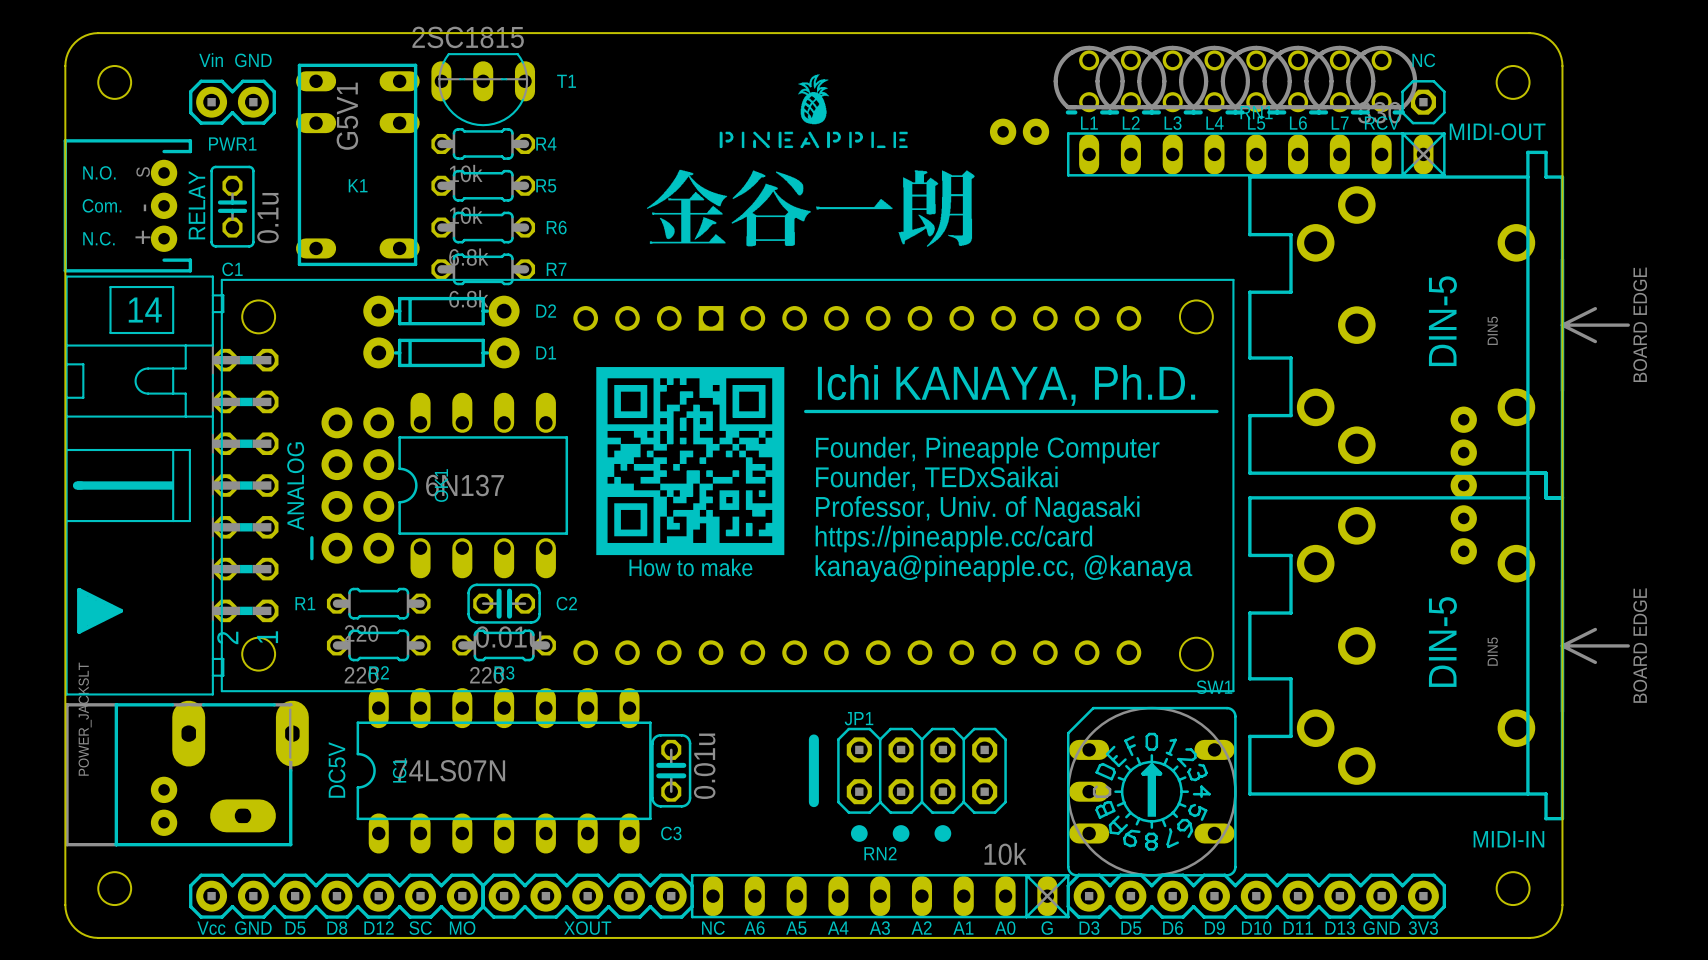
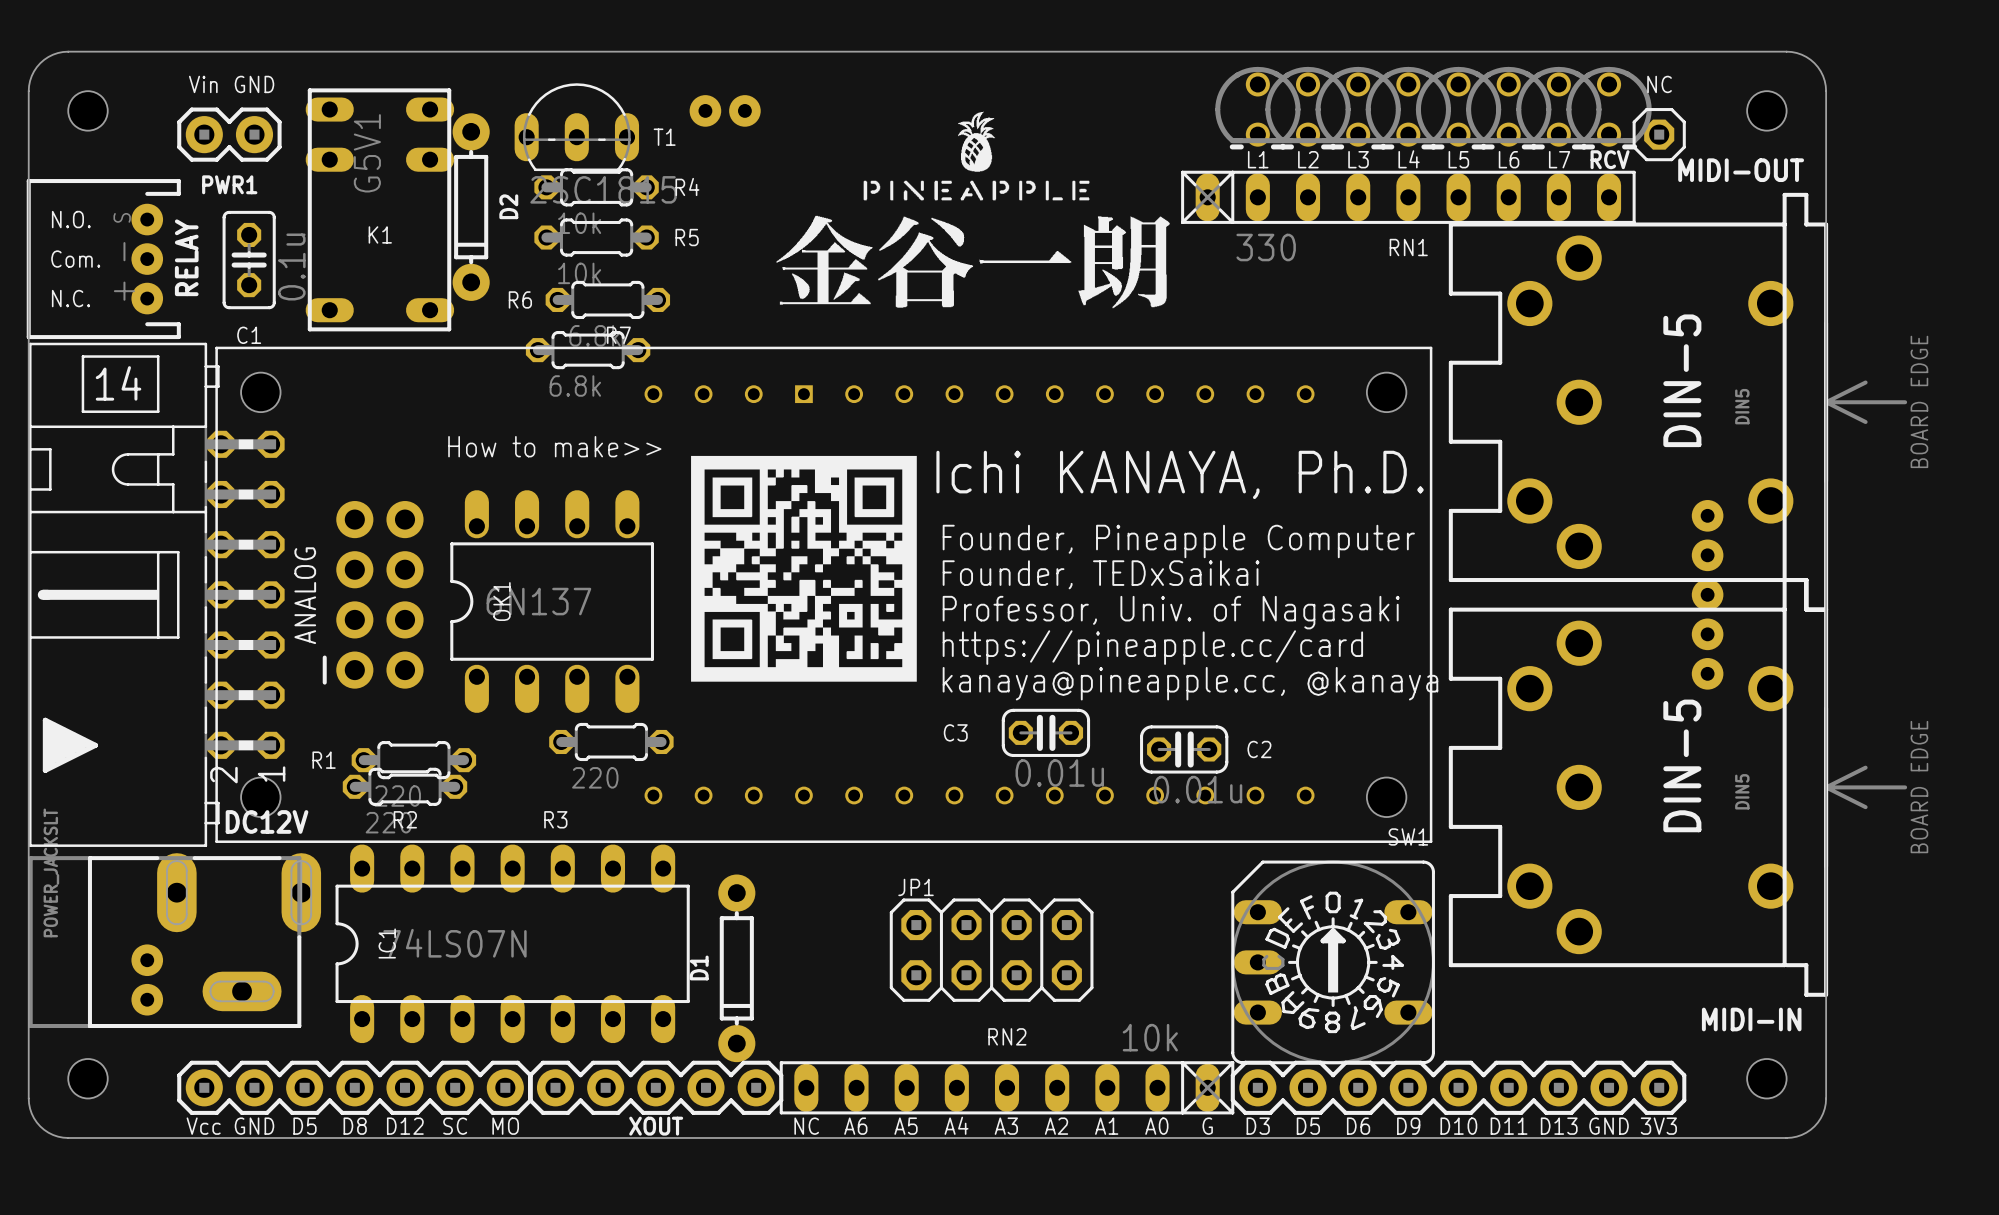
T1 rotation: 0° (483, 89) -> 180° (576, 127)
drawing position: (813, 111) -> (976, 155)
part position: (1019, 131) -> (725, 110)
R4 position: (483, 143) -> (596, 187)
R4 name position: R4 (546, 143) -> R4 (687, 186)
RN1 rotation: 0° (1256, 154) -> 180° (1408, 197)
R5 position: (483, 185) -> (596, 237)
R5 name position: R5 (546, 185) -> R5 (687, 237)
C1 position: (232, 206) -> (249, 260)
drawing position: (810, 208) -> (973, 262)
R6 position: (483, 227) -> (607, 299)
R6 name position: R6 (556, 227) -> R6 (520, 299)
R7 position: (483, 269) -> (588, 350)
part footprint: [220, 278, 1235, 693] -> [215, 346, 1433, 843]
D2 rotation: 0° (441, 311) -> 90° counterclockwise (471, 207)
D2 position: (441, 311) -> (471, 207)
D2 name position: D2 (546, 311) -> D2 (508, 206)
D1 rotation: 0° (441, 352) -> 90° counterclockwise (736, 968)
D1 position: (441, 352) -> (736, 968)
D1 name position: D1 (546, 352) -> D1 (699, 967)
text: none -> How to make>> (554, 446)
line: (805, 411) (1216, 411) -> none
text position: Founder, Pineapple Computer (987, 450) -> Founder, Pineapple Computer (1178, 541)
drawing position: (690, 461) -> (803, 568)
text position: Founder, TEDxSaikai (936, 478) -> Founder, TEDxSaikai (1101, 574)
OK1 position: (483, 485) -> (552, 601)
text position: Professor, Univ. of Nagasaki (977, 509) -> Professor, Univ. of Nagasaki (1171, 612)
text position: https://pineapple.cc/card (953, 538) -> https://pineapple.cc/card (1152, 647)
text: How to make (690, 567) -> none
text position: kanaya@pineapple.cc, @kanaya (1003, 568) -> kanaya@pineapple.cc, @kanaya (1190, 683)
R1 position: (378, 603) -> (413, 760)
C2 position: (504, 603) -> (1184, 749)
R3 position: (504, 645) -> (611, 741)
line: (813, 739) (813, 802) -> none
DC5V name: DC5V (336, 769) -> DC12V (267, 821)
IC1 position: (504, 770) -> (512, 943)
C3 rotation: 0° (671, 770) -> 90° clockwise (1045, 732)
C3 position: (671, 770) -> (1045, 732)
JP1 position: (921, 770) -> (991, 950)
drawing: [850, 825, 868, 842] -> none
drawing: [892, 825, 910, 842] -> none
drawing: [934, 825, 952, 842] -> none

